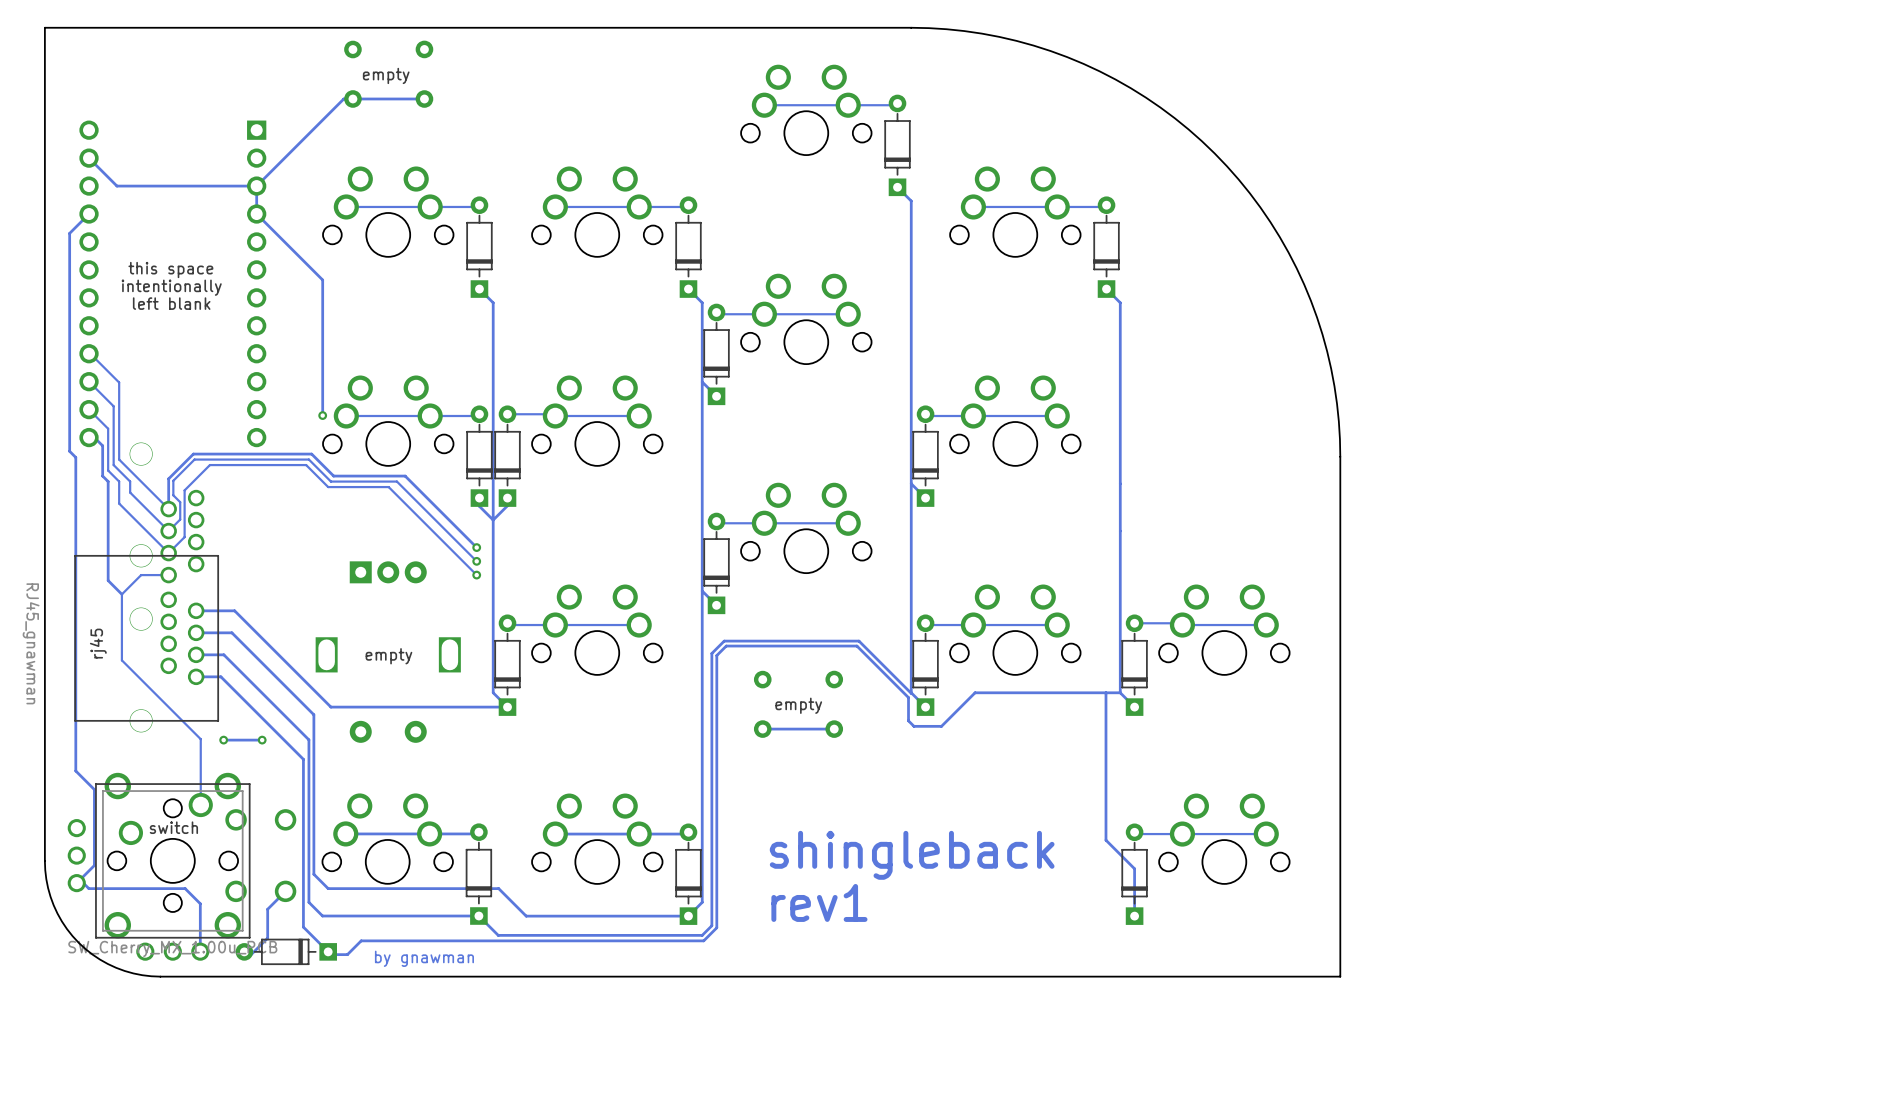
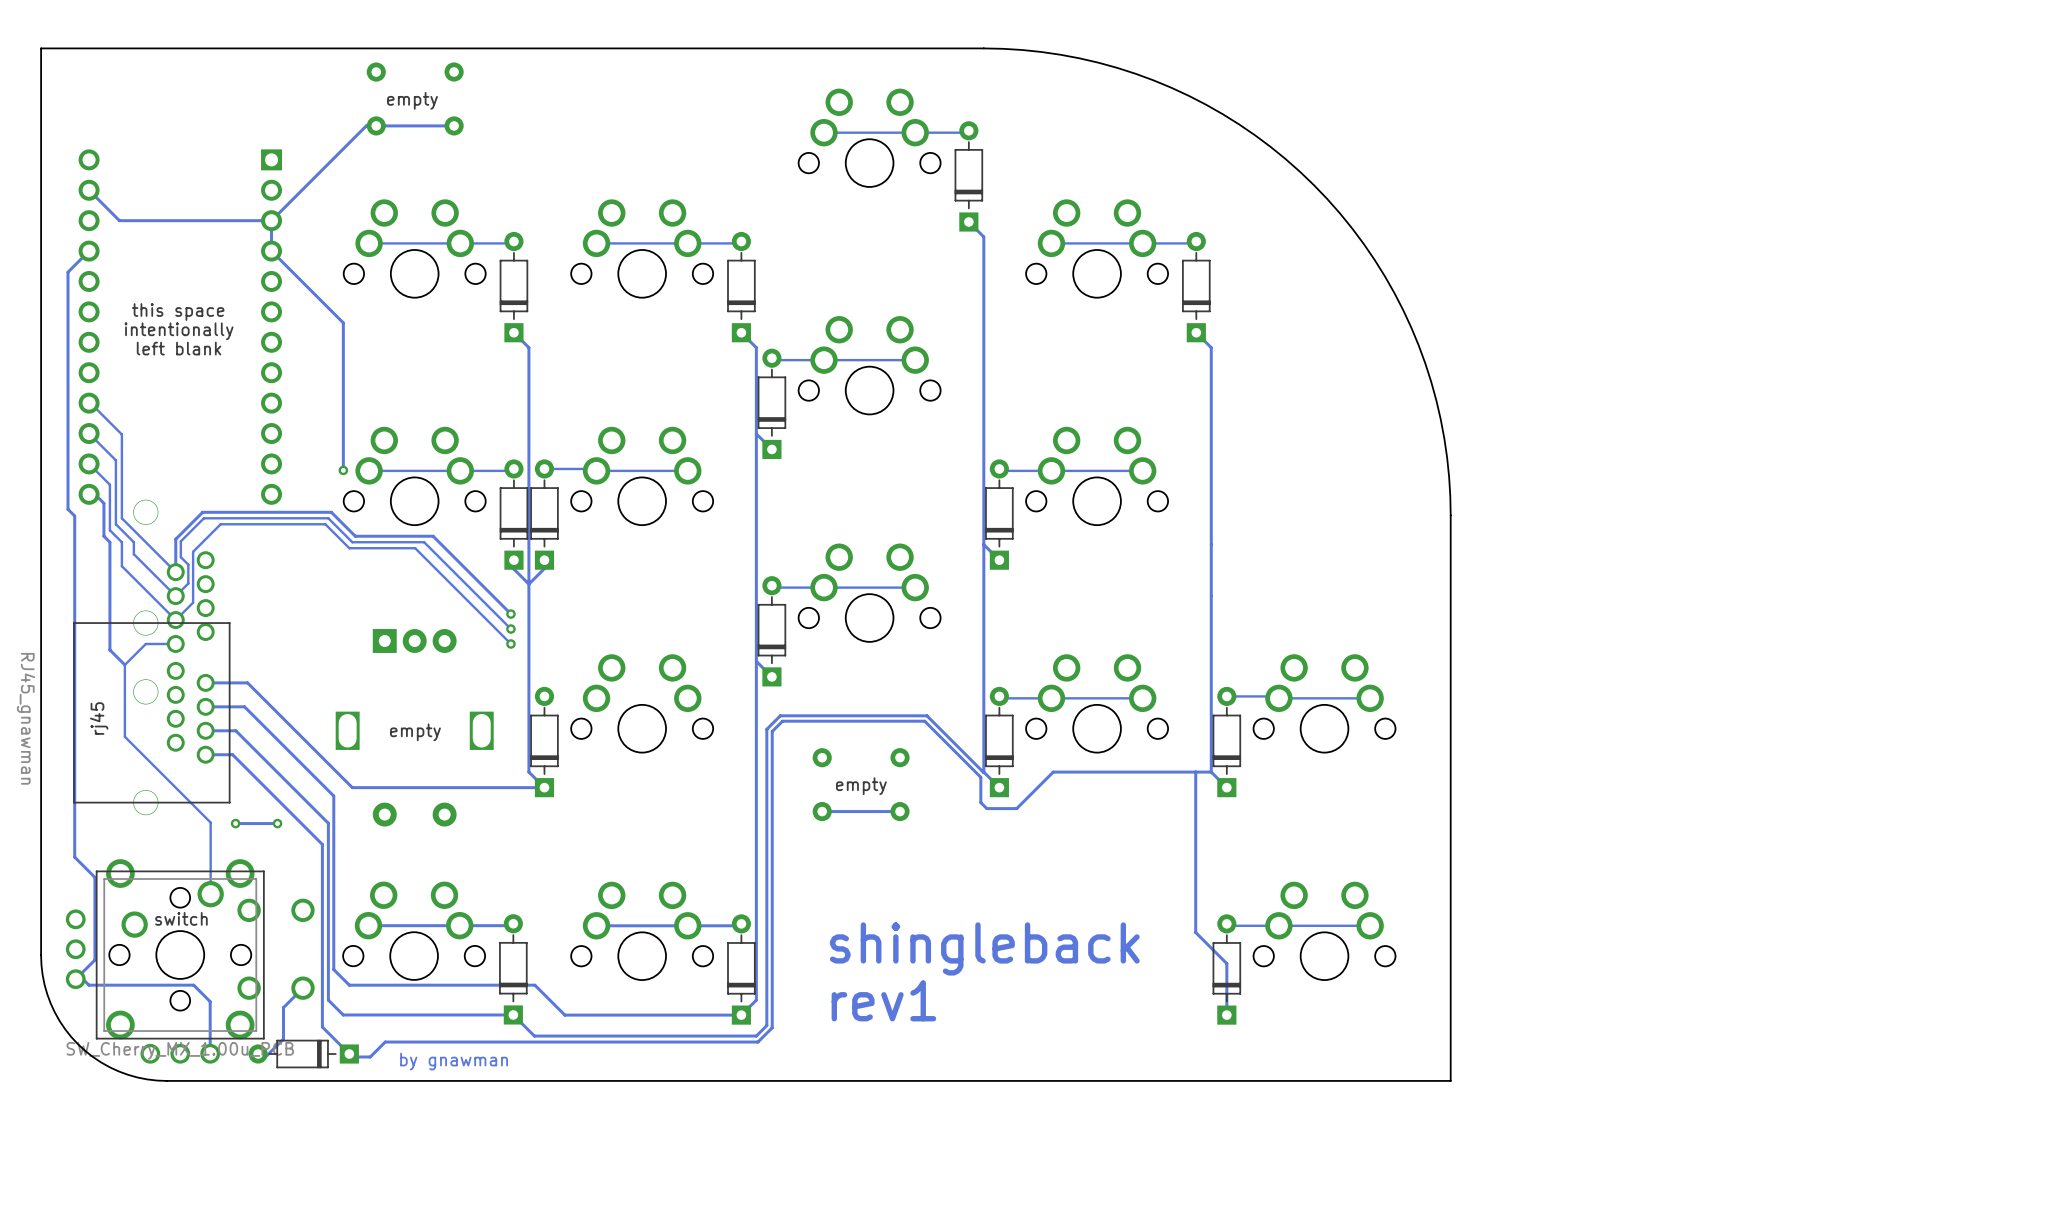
track: (507, 623) (509, 625) (639, 625) -> none

